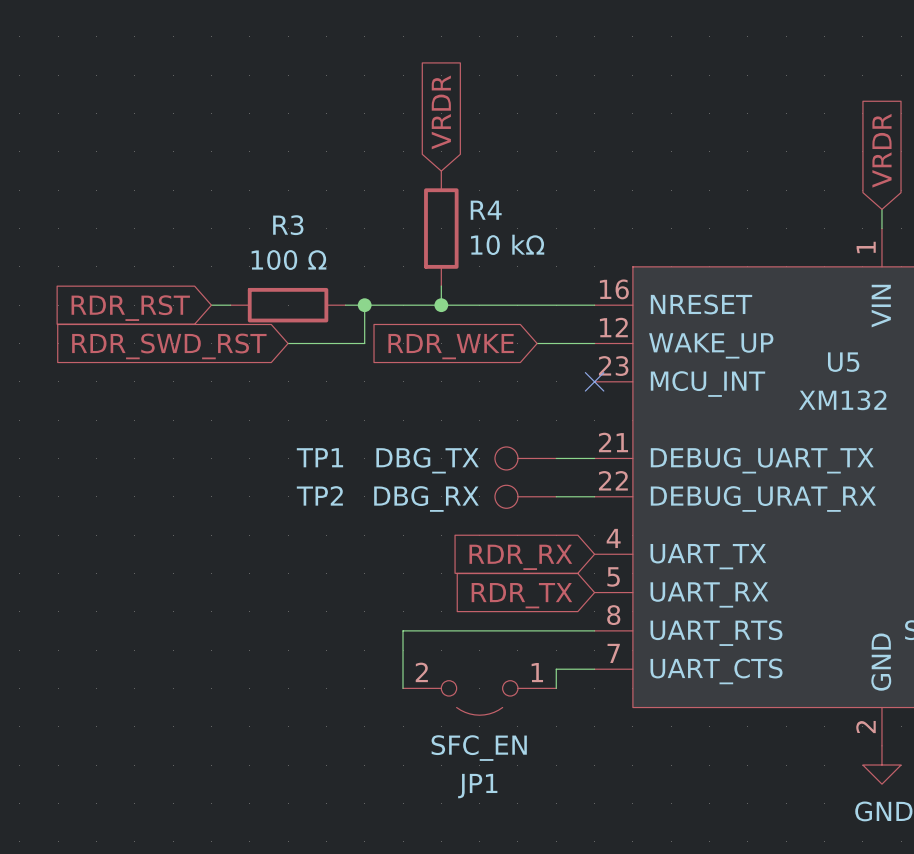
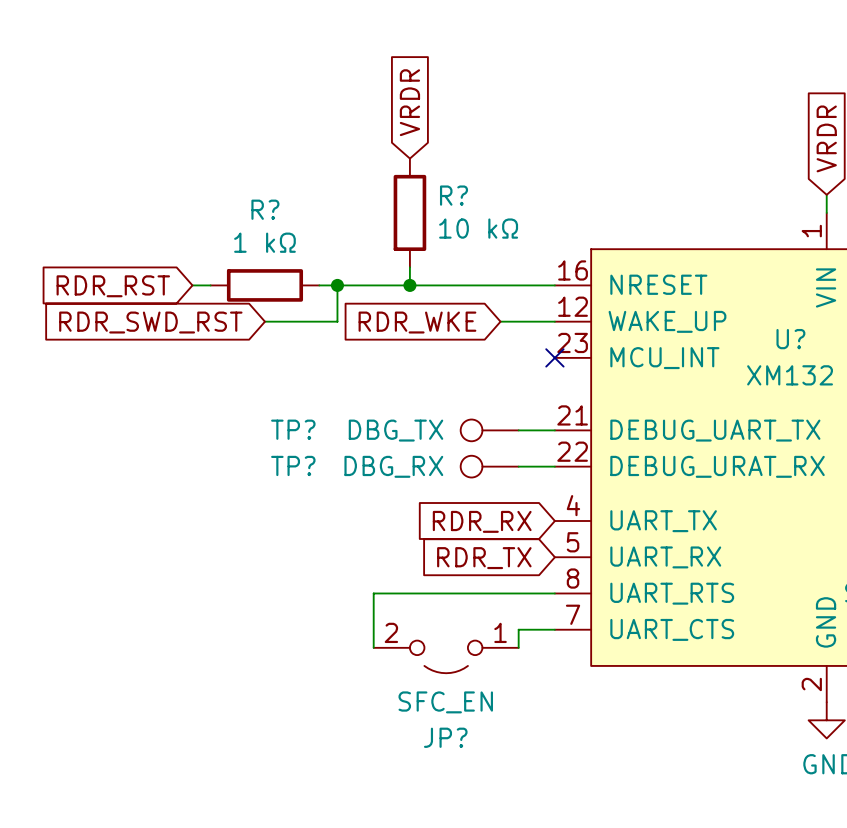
R4 name: R4 (486, 210) -> R? (454, 195)
R3 name: R3 (288, 225) -> R? (265, 209)
R3 value: 100 Ω (288, 260) -> 1 kΩ (264, 242)
U5 name: U5 (843, 362) -> U? (790, 339)
TP1 name: TP1 (319, 457) -> TP? (293, 429)
TP2 name: TP2 (319, 495) -> TP? (293, 465)
JP1 name: JP1 (477, 786) -> JP? (445, 737)

